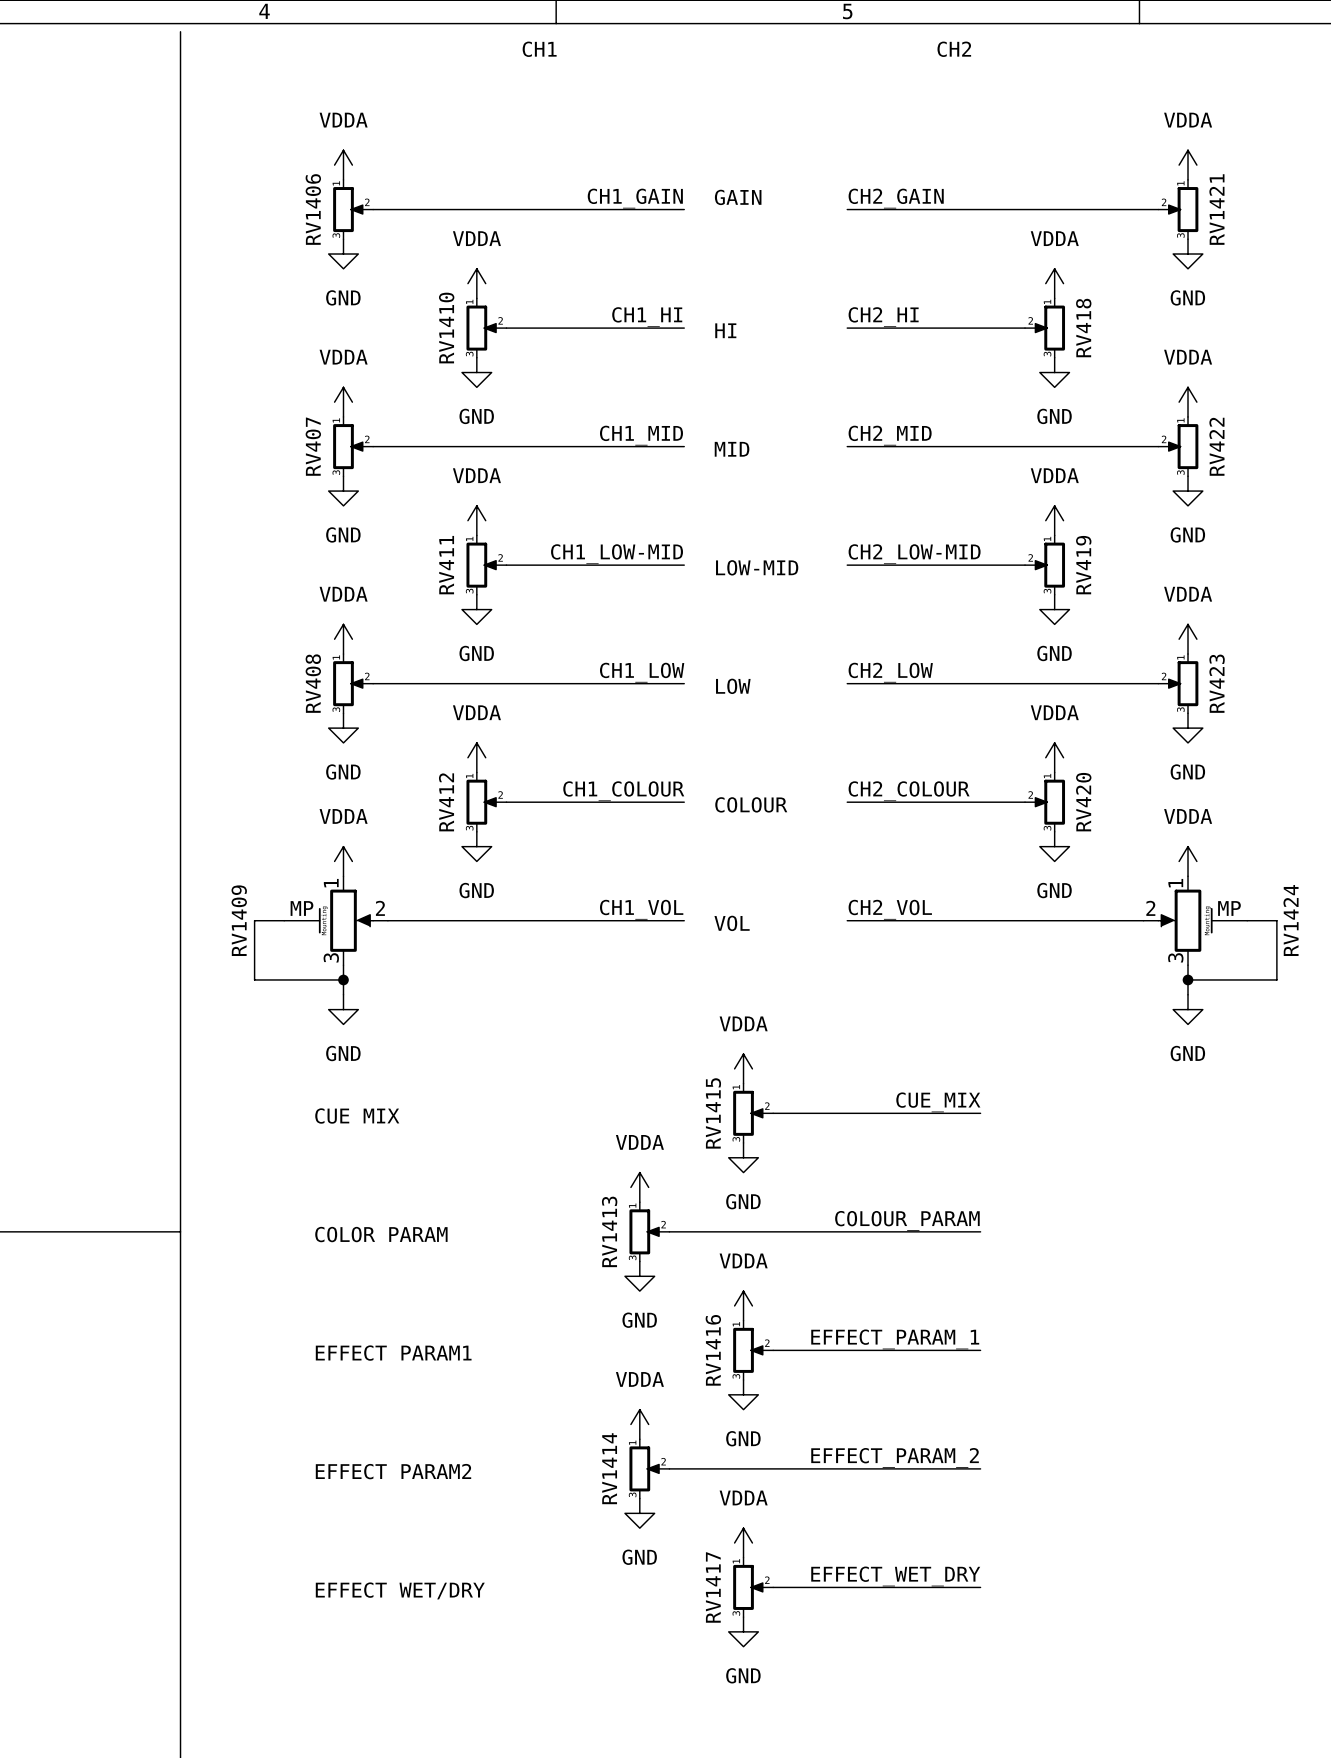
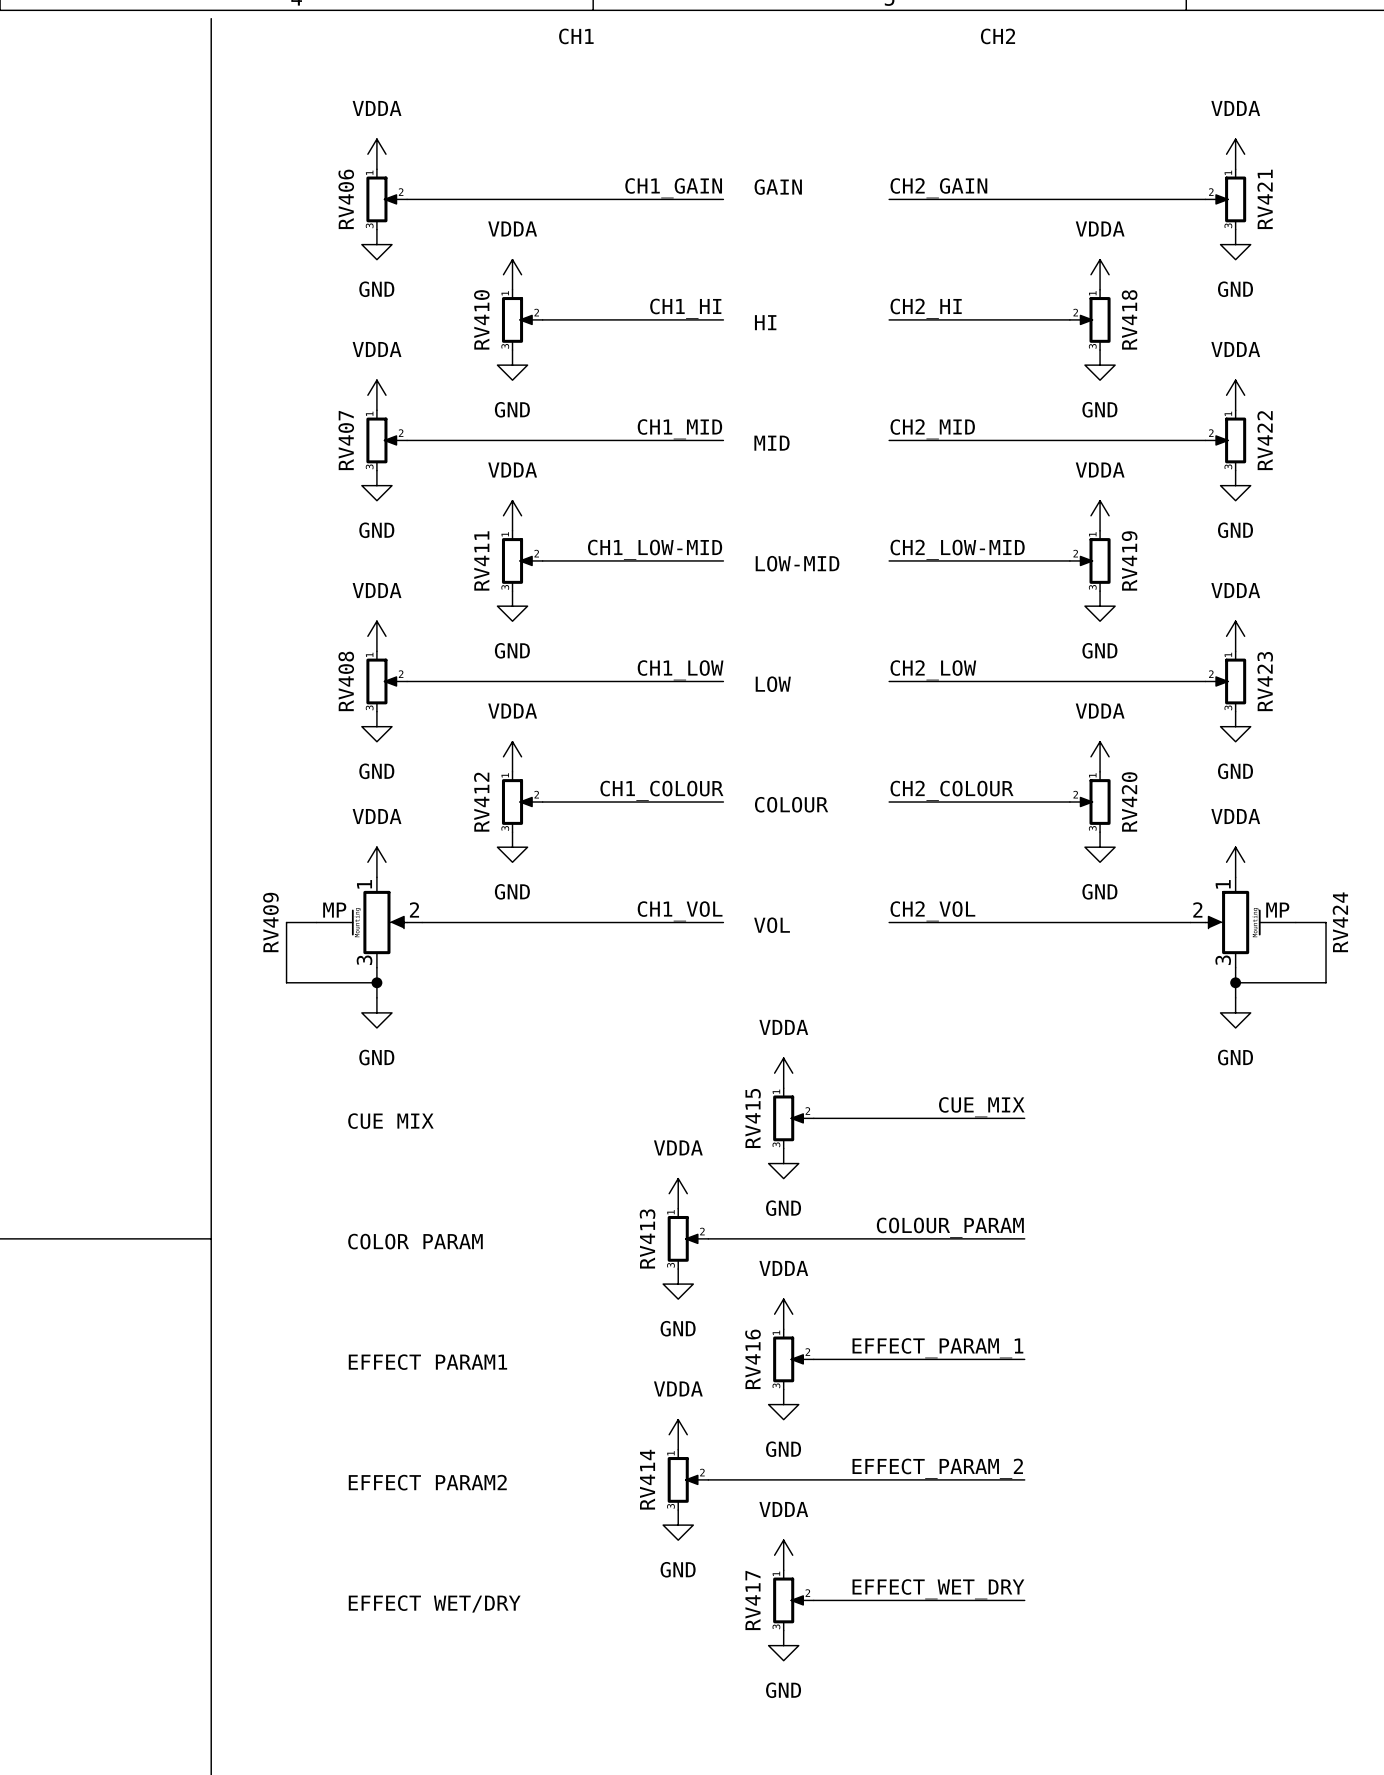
RV1406 name: RV1406 (313, 209) -> RV406 (346, 199)
RV1421 name: RV1421 (1216, 209) -> RV421 (1265, 199)
RV1410 name: RV1410 (446, 328) -> RV410 (481, 319)
RV1409 name: RV1409 (239, 920) -> RV409 (270, 922)
RV1424 name: RV1424 (1291, 920) -> RV424 (1340, 922)
RV1415 name: RV1415 (713, 1113) -> RV415 (753, 1118)
RV1413 name: RV1413 (609, 1231) -> RV413 (647, 1238)
RV1416 name: RV1416 (713, 1350) -> RV416 (753, 1359)
RV1414 name: RV1414 (609, 1468) -> RV414 (647, 1479)
RV1417 name: RV1417 (713, 1587) -> RV417 (752, 1600)

